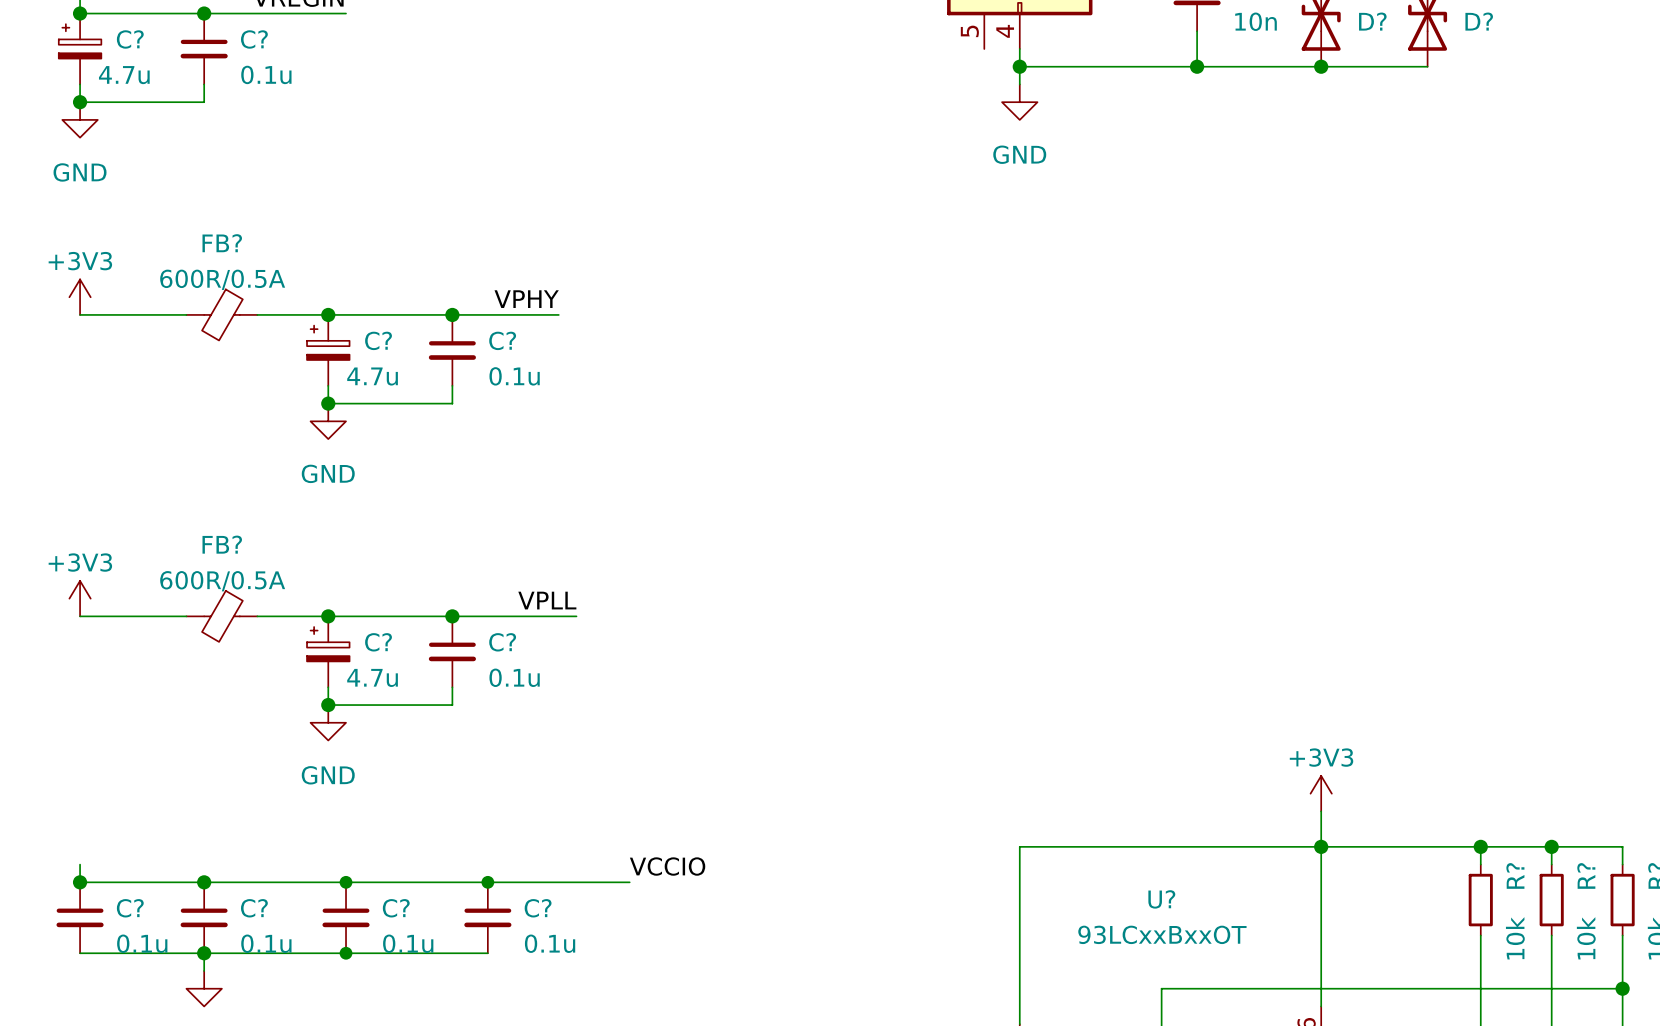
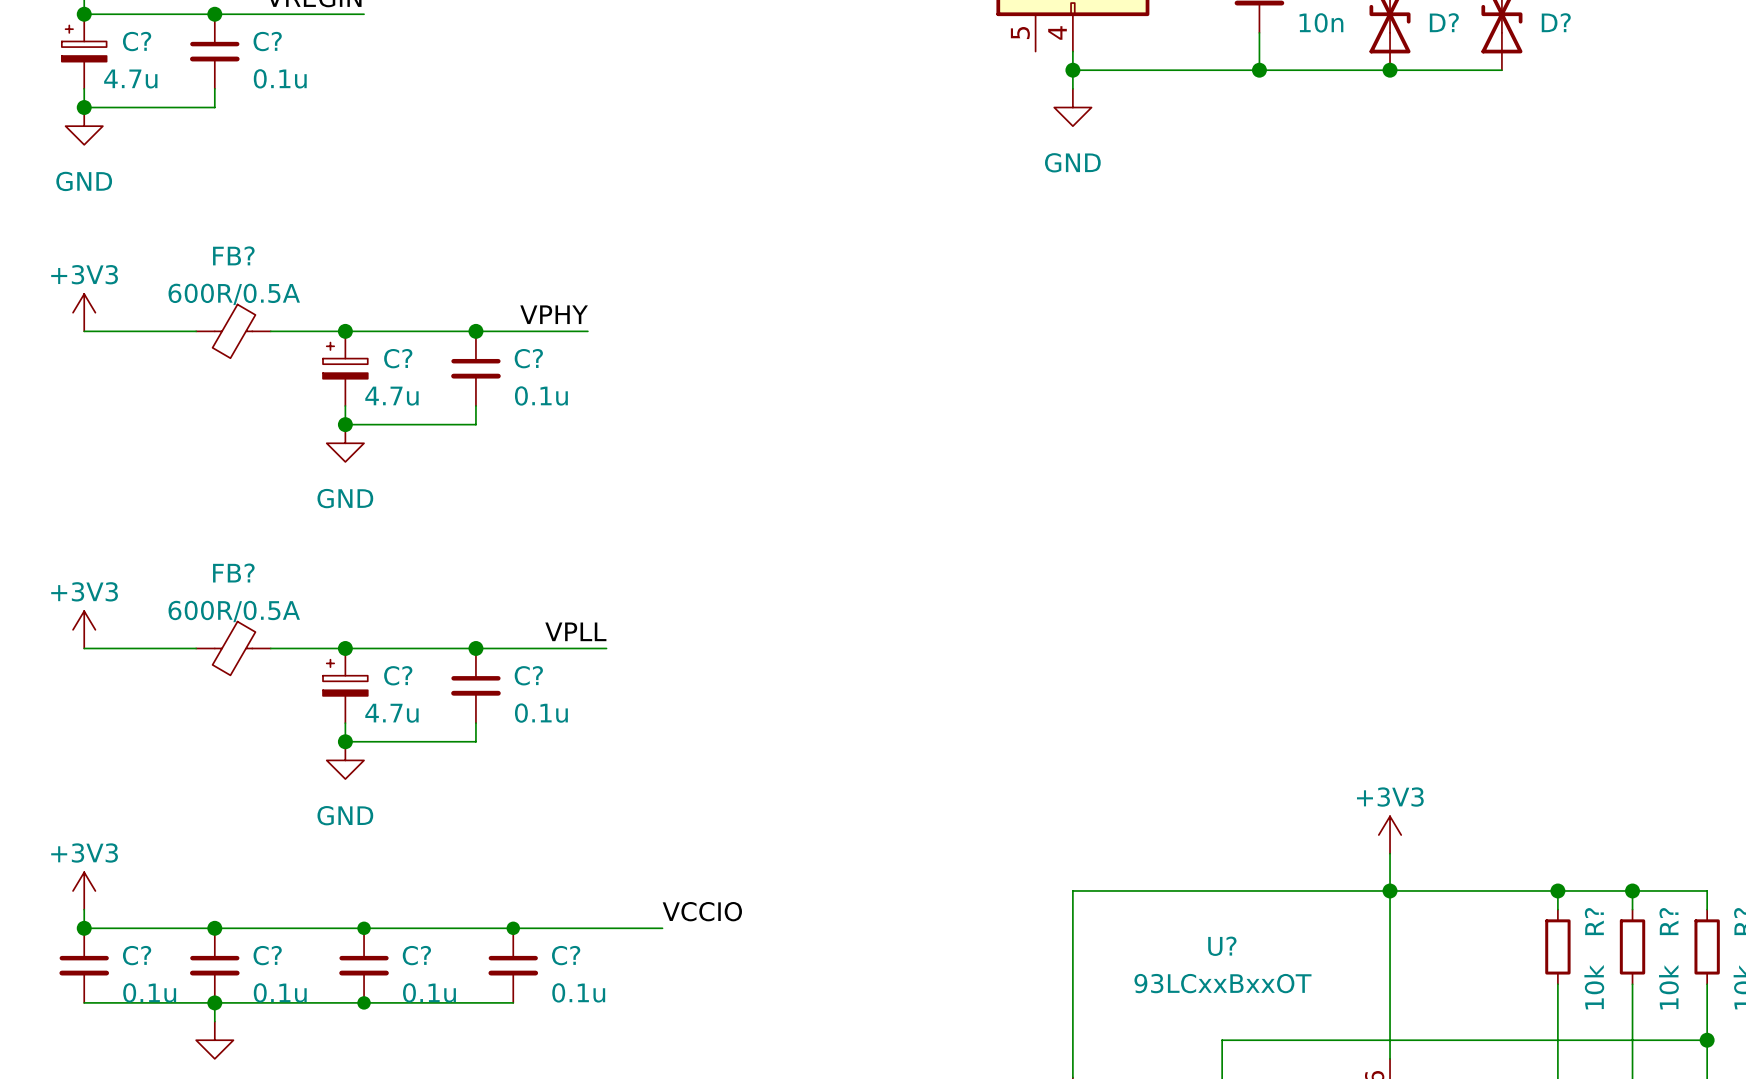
power symbol: none -> +3V3 (84, 890)

